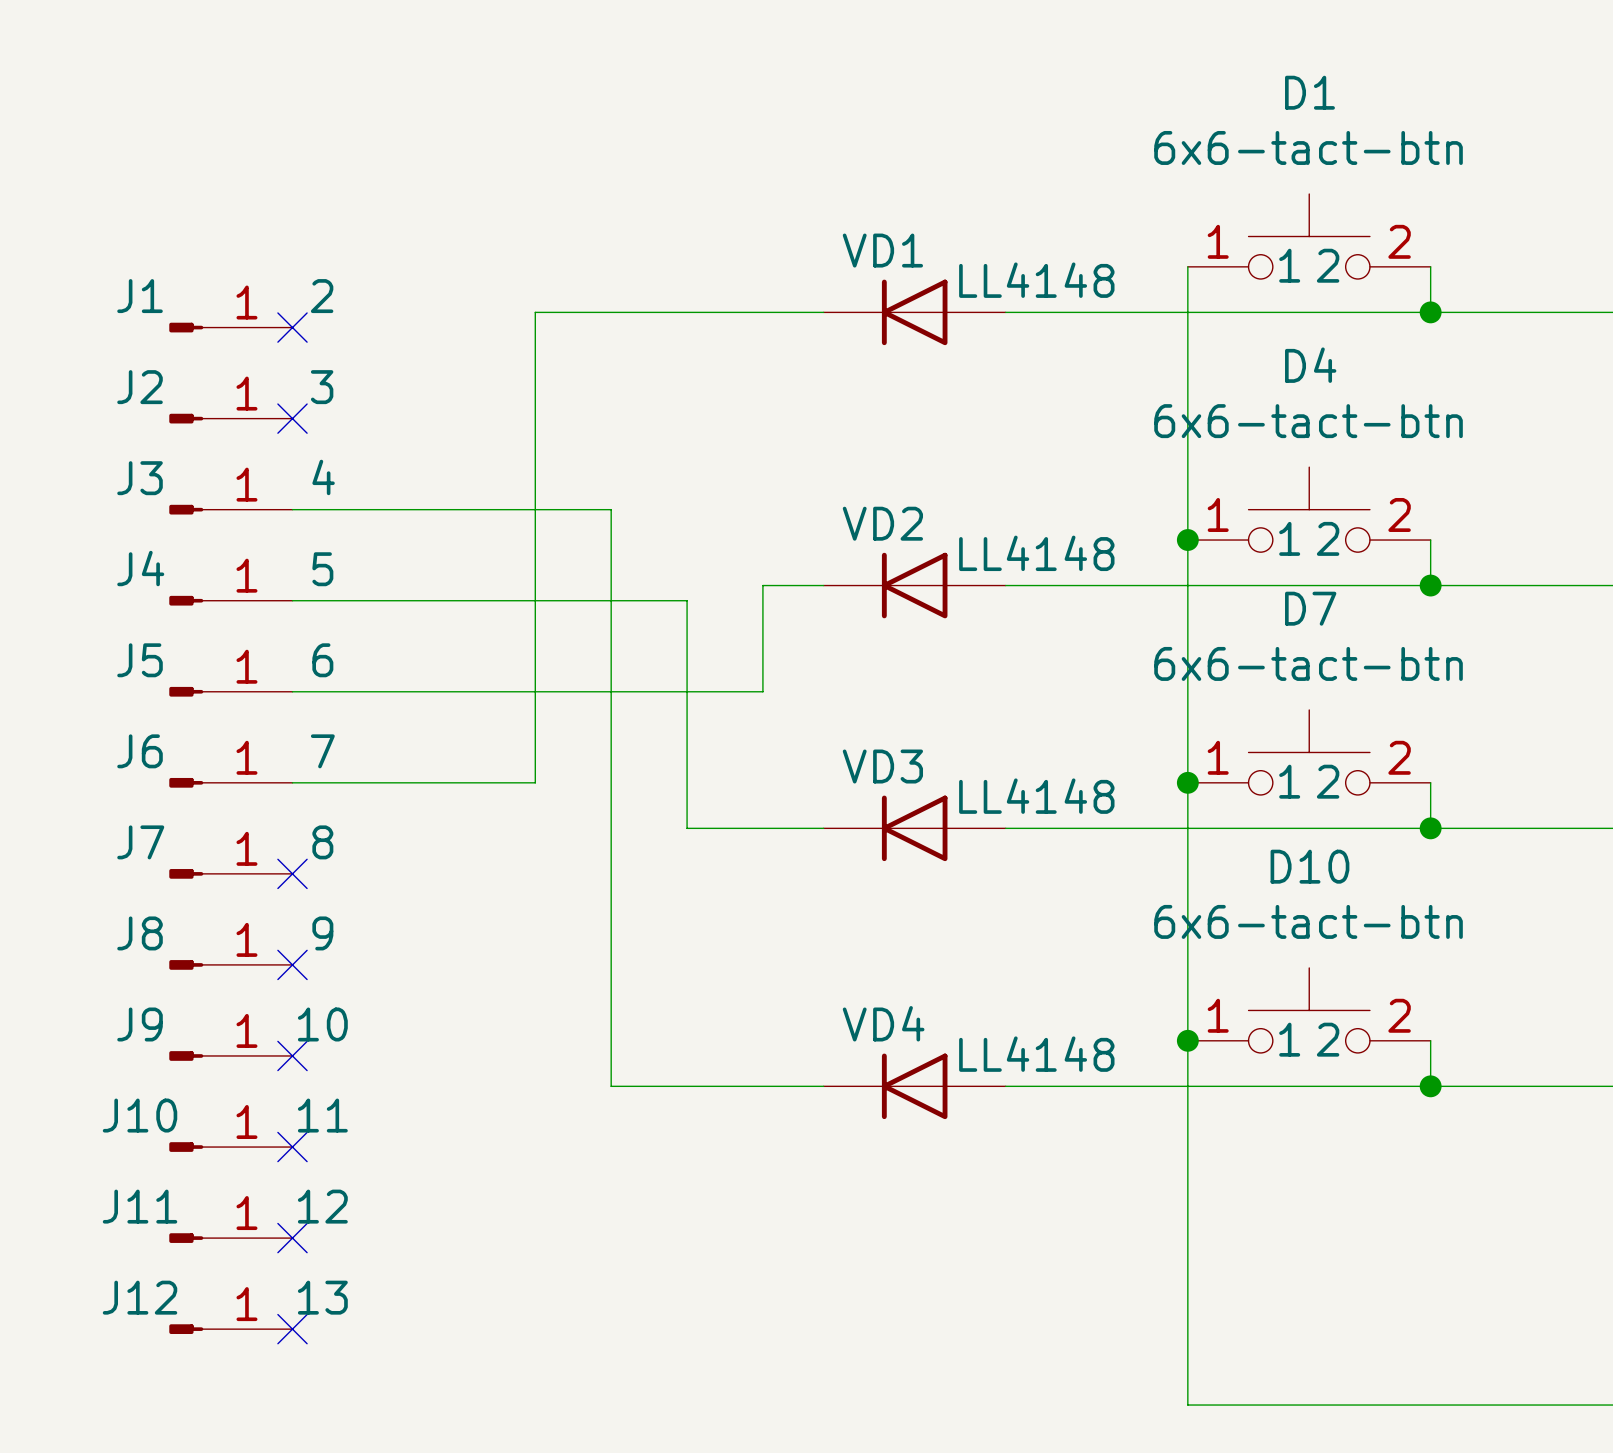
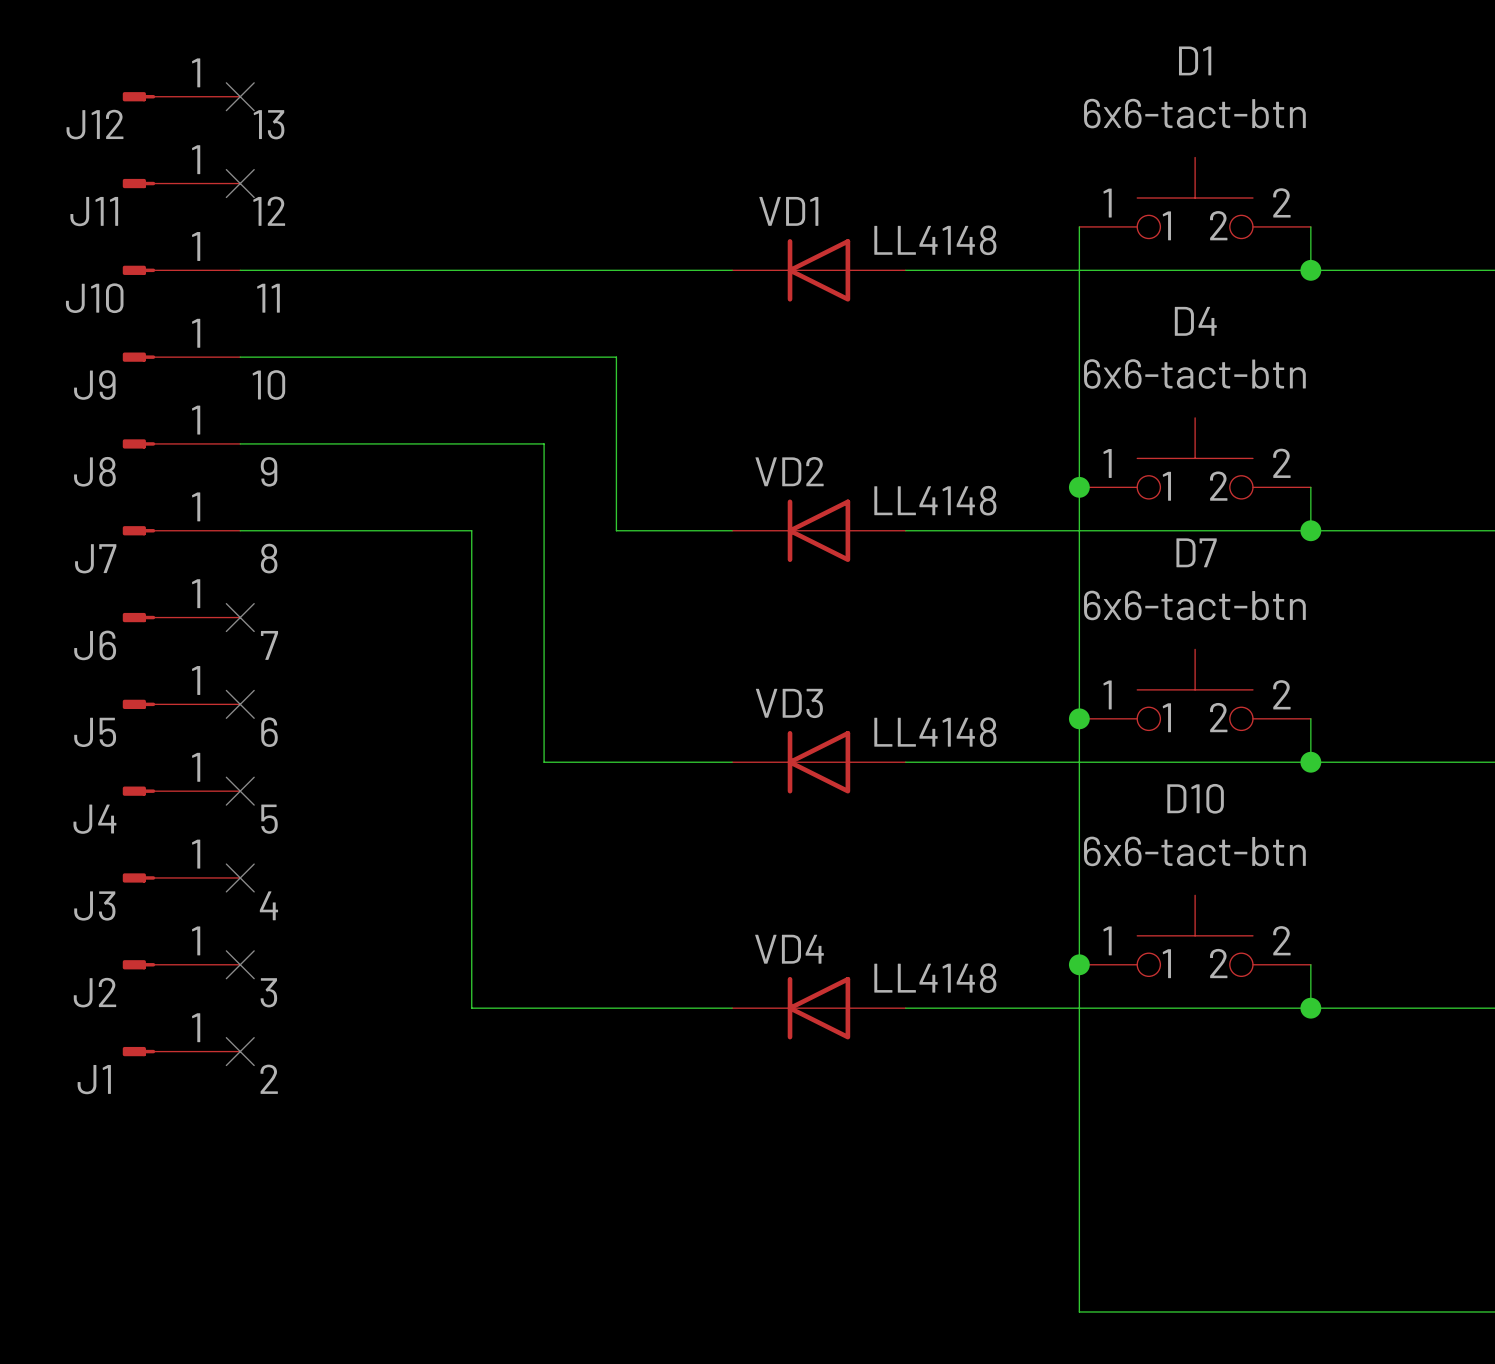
no-connect mark: none -> (240, 96)
no-connect mark: none -> (240, 183)
J1 name position: J1 (140, 296) -> J1 (94, 1079)
J1 value position: 2 (322, 296) -> 2 (269, 1079)
wire: (535, 312) (535, 782) (292, 782) -> (457, 270) (240, 270)
J1 position: (230, 327) -> (181, 1051)
no-connect mark: (292, 327) -> none
J2 name position: J2 (140, 387) -> J2 (94, 992)
J2 value position: 3 (322, 387) -> 3 (268, 992)
J2 position: (230, 418) -> (181, 964)
no-connect mark: (292, 418) -> none
J3 value position: 4 (323, 477) -> 4 (268, 905)
J3 name position: J3 (140, 478) -> J3 (94, 905)
J3 position: (230, 509) -> (181, 877)
wire: (292, 509) (611, 509) (611, 1086) -> (240, 530) (471, 530) (471, 1008) (529, 1008)
J4 name position: J4 (140, 568) -> J4 (94, 819)
J4 value position: 5 (322, 569) -> 5 (269, 819)
wire: (762, 585) (762, 691) (292, 691) -> (674, 530) (616, 530) (616, 357) (240, 357)
J4 position: (230, 600) -> (181, 791)
wire: (292, 600) (687, 600) (687, 828) -> (240, 443) (544, 443) (544, 762) (601, 762)
J5 name position: J5 (140, 660) -> J5 (95, 732)
J5 value position: 6 (322, 660) -> 6 (269, 732)
no-connect mark: none -> (240, 617)
J5 position: (230, 691) -> (181, 704)
J6 name position: J6 (140, 751) -> J6 (95, 645)
J6 value position: 7 (322, 751) -> 7 (269, 645)
no-connect mark: none -> (240, 704)
J6 position: (230, 782) -> (181, 617)
J7 name position: J7 (140, 842) -> J7 (95, 558)
J7 value position: 8 (322, 842) -> 8 (269, 558)
J7 position: (230, 873) -> (181, 530)
no-connect mark position: (292, 873) -> (240, 791)
J8 name position: J8 (140, 933) -> J8 (94, 471)
J8 value position: 9 (322, 933) -> 9 (269, 471)
J8 position: (230, 964) -> (181, 443)
no-connect mark position: (292, 964) -> (240, 877)
J9 name position: J9 (140, 1024) -> J9 (94, 385)
J9 value position: 10 (322, 1024) -> 10 (268, 385)
J9 position: (230, 1055) -> (181, 357)
no-connect mark position: (292, 1055) -> (240, 964)
J10 name position: J10 (140, 1115) -> J10 (94, 298)
J10 value position: 11 (322, 1115) -> 11 (268, 298)
J10 position: (230, 1147) -> (181, 270)
no-connect mark position: (292, 1147) -> (240, 1051)
J11 name position: J11 (140, 1206) -> J11 (94, 211)
J11 value position: 12 (322, 1206) -> 12 (269, 211)
J11 position: (230, 1238) -> (181, 183)
no-connect mark: (292, 1238) -> none
J12 name position: J12 (140, 1297) -> J12 (94, 124)
J12 value position: 13 (322, 1297) -> 13 (269, 124)
J12 position: (230, 1329) -> (181, 96)
no-connect mark: (292, 1329) -> none

